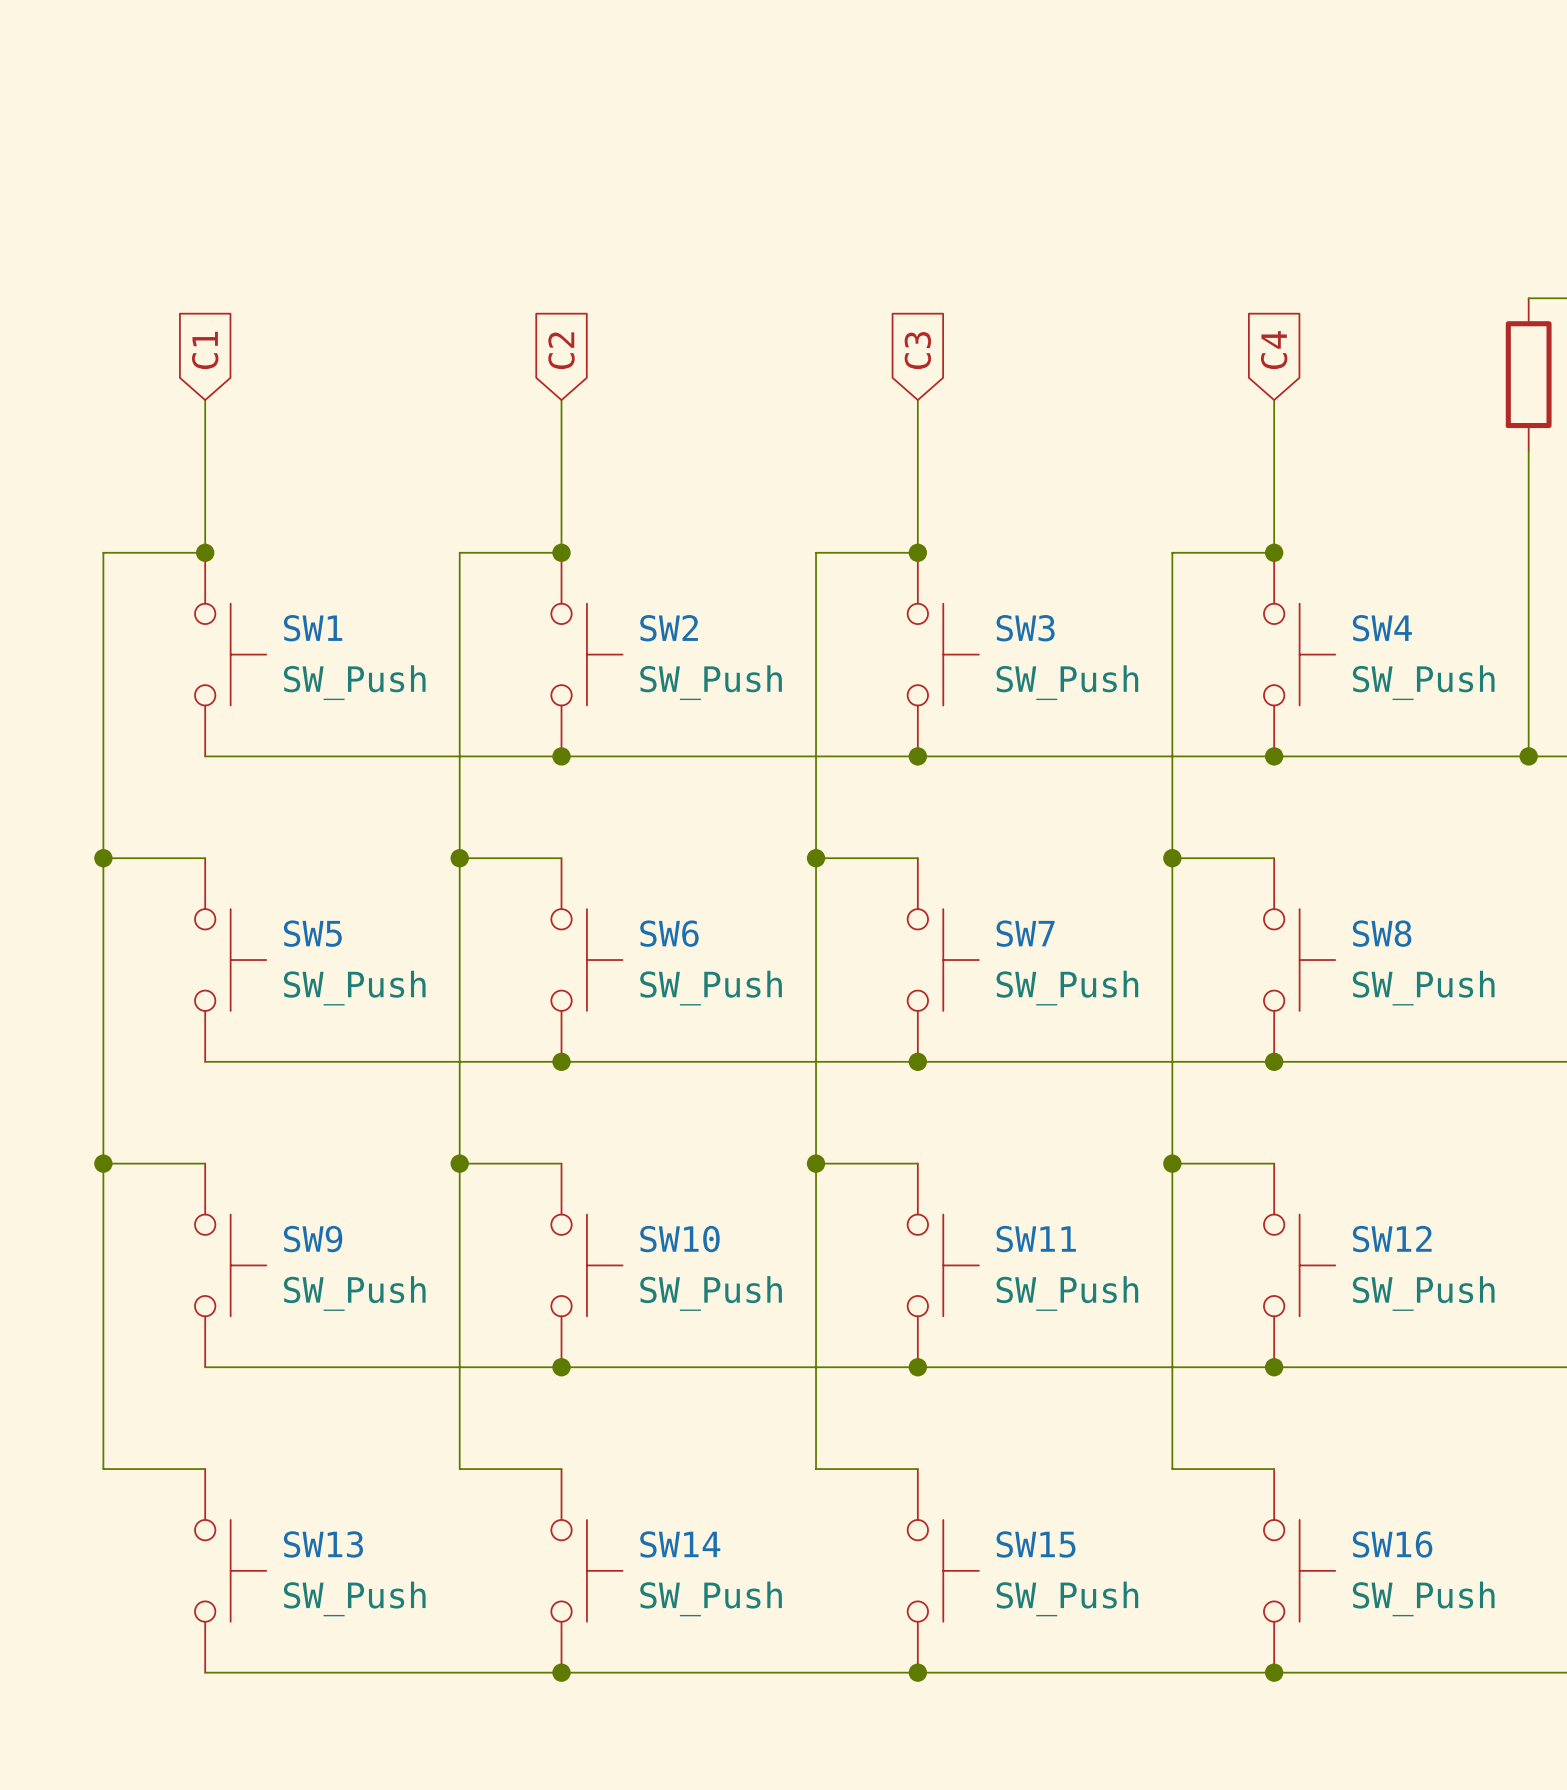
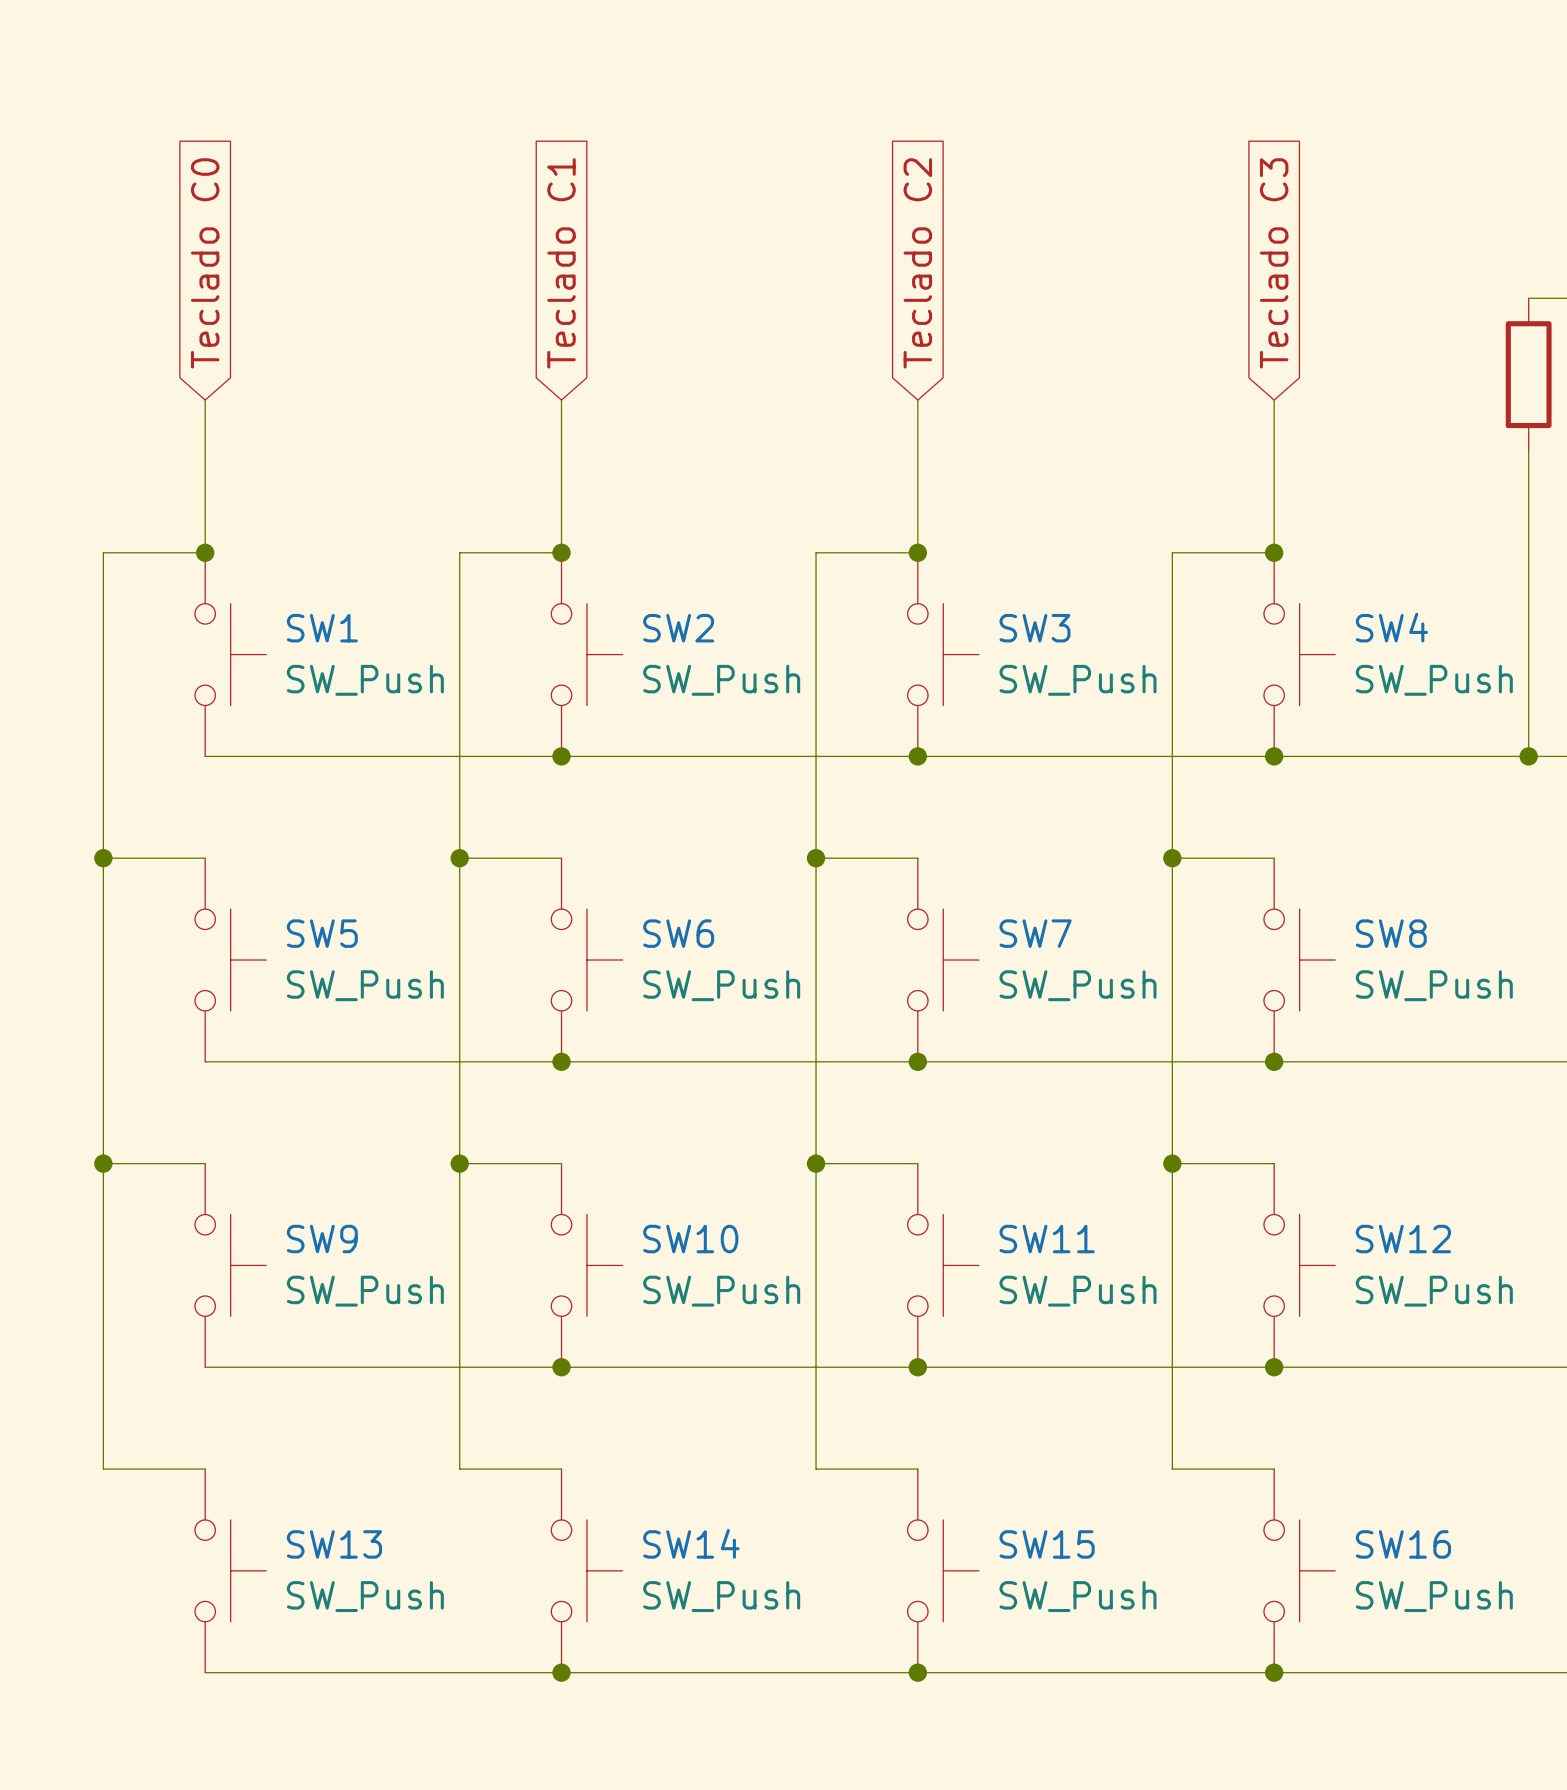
global label: C1 (205, 350) -> Teclado C0 (205, 263)
global label: C2 (561, 350) -> Teclado C1 (561, 263)
global label: C3 (917, 350) -> Teclado C2 (917, 263)
global label: C4 (1274, 350) -> Teclado C3 (1274, 263)

